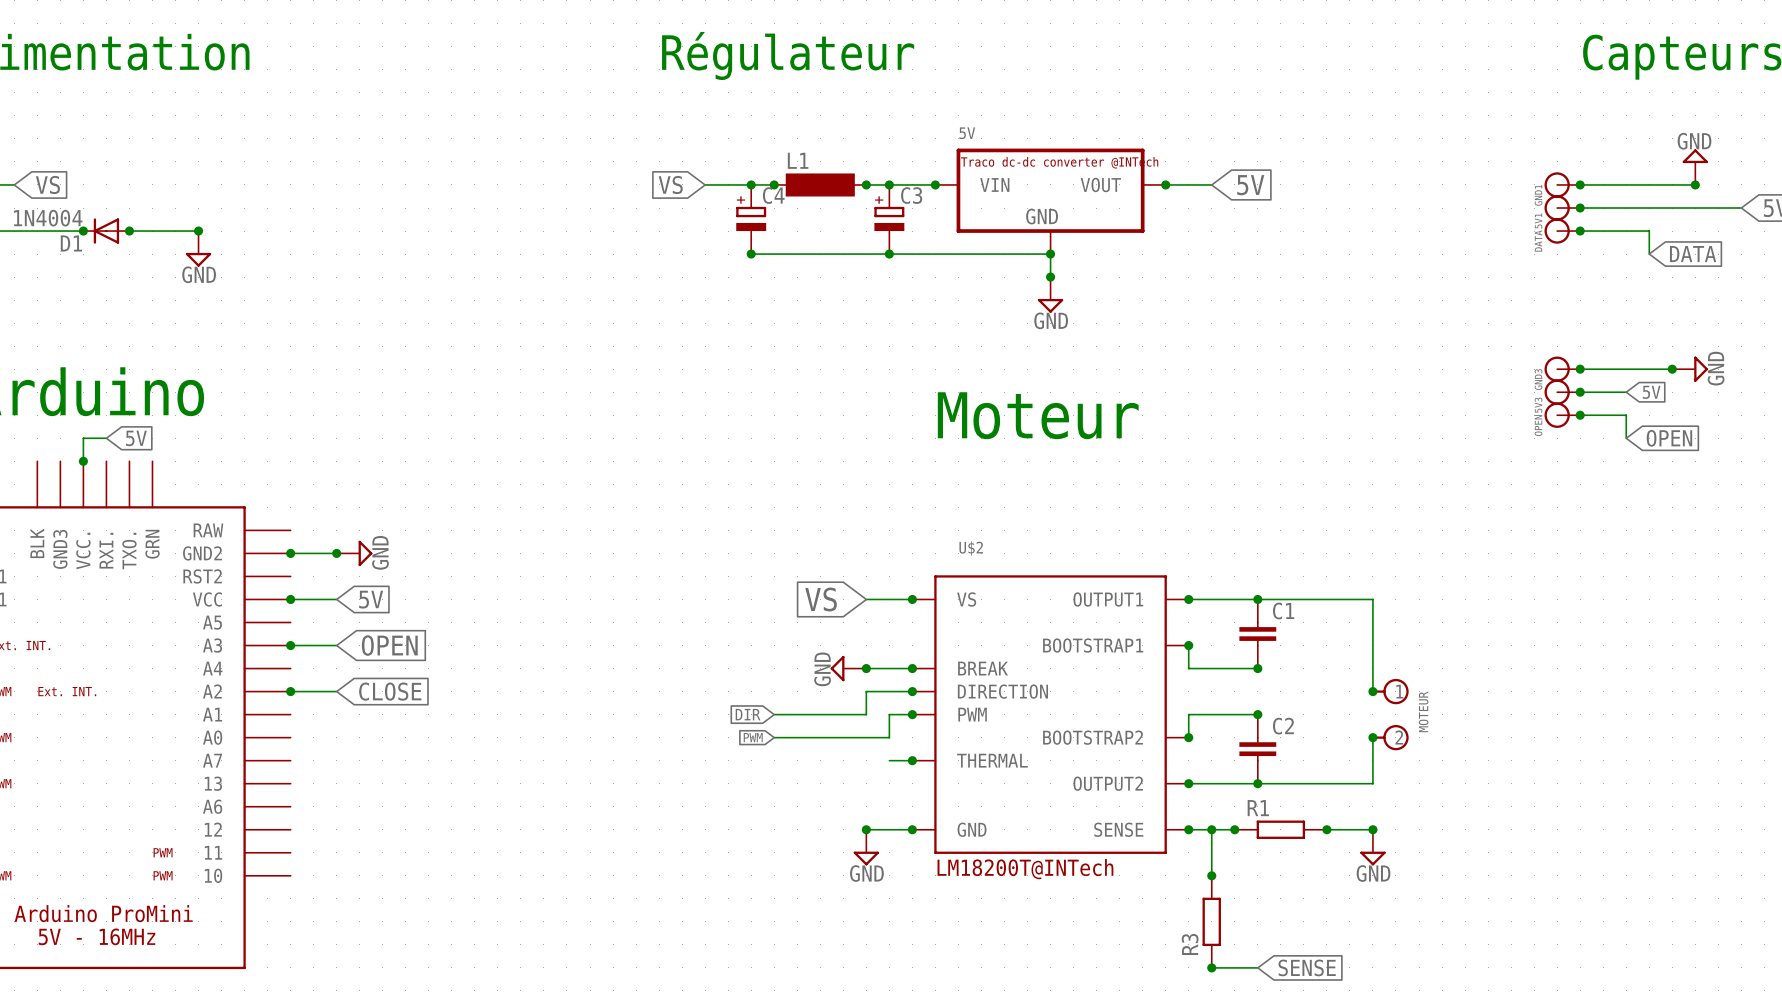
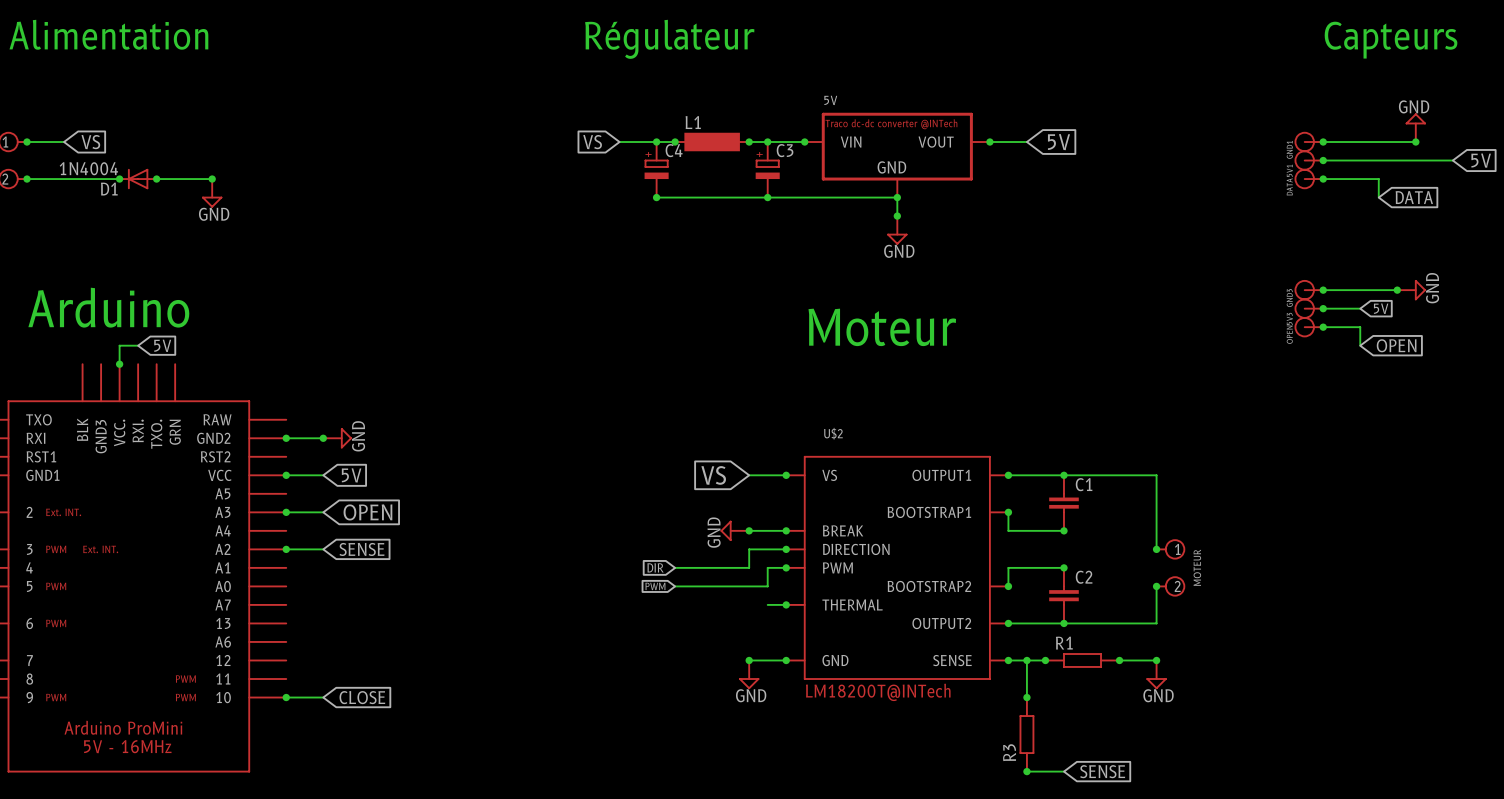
global label: CLOSE (390, 691) -> SENSE (361, 549)
wire: none -> (286, 697) (323, 697)
junction: none -> (286, 697)
global label: none -> CLOSE (362, 697)

